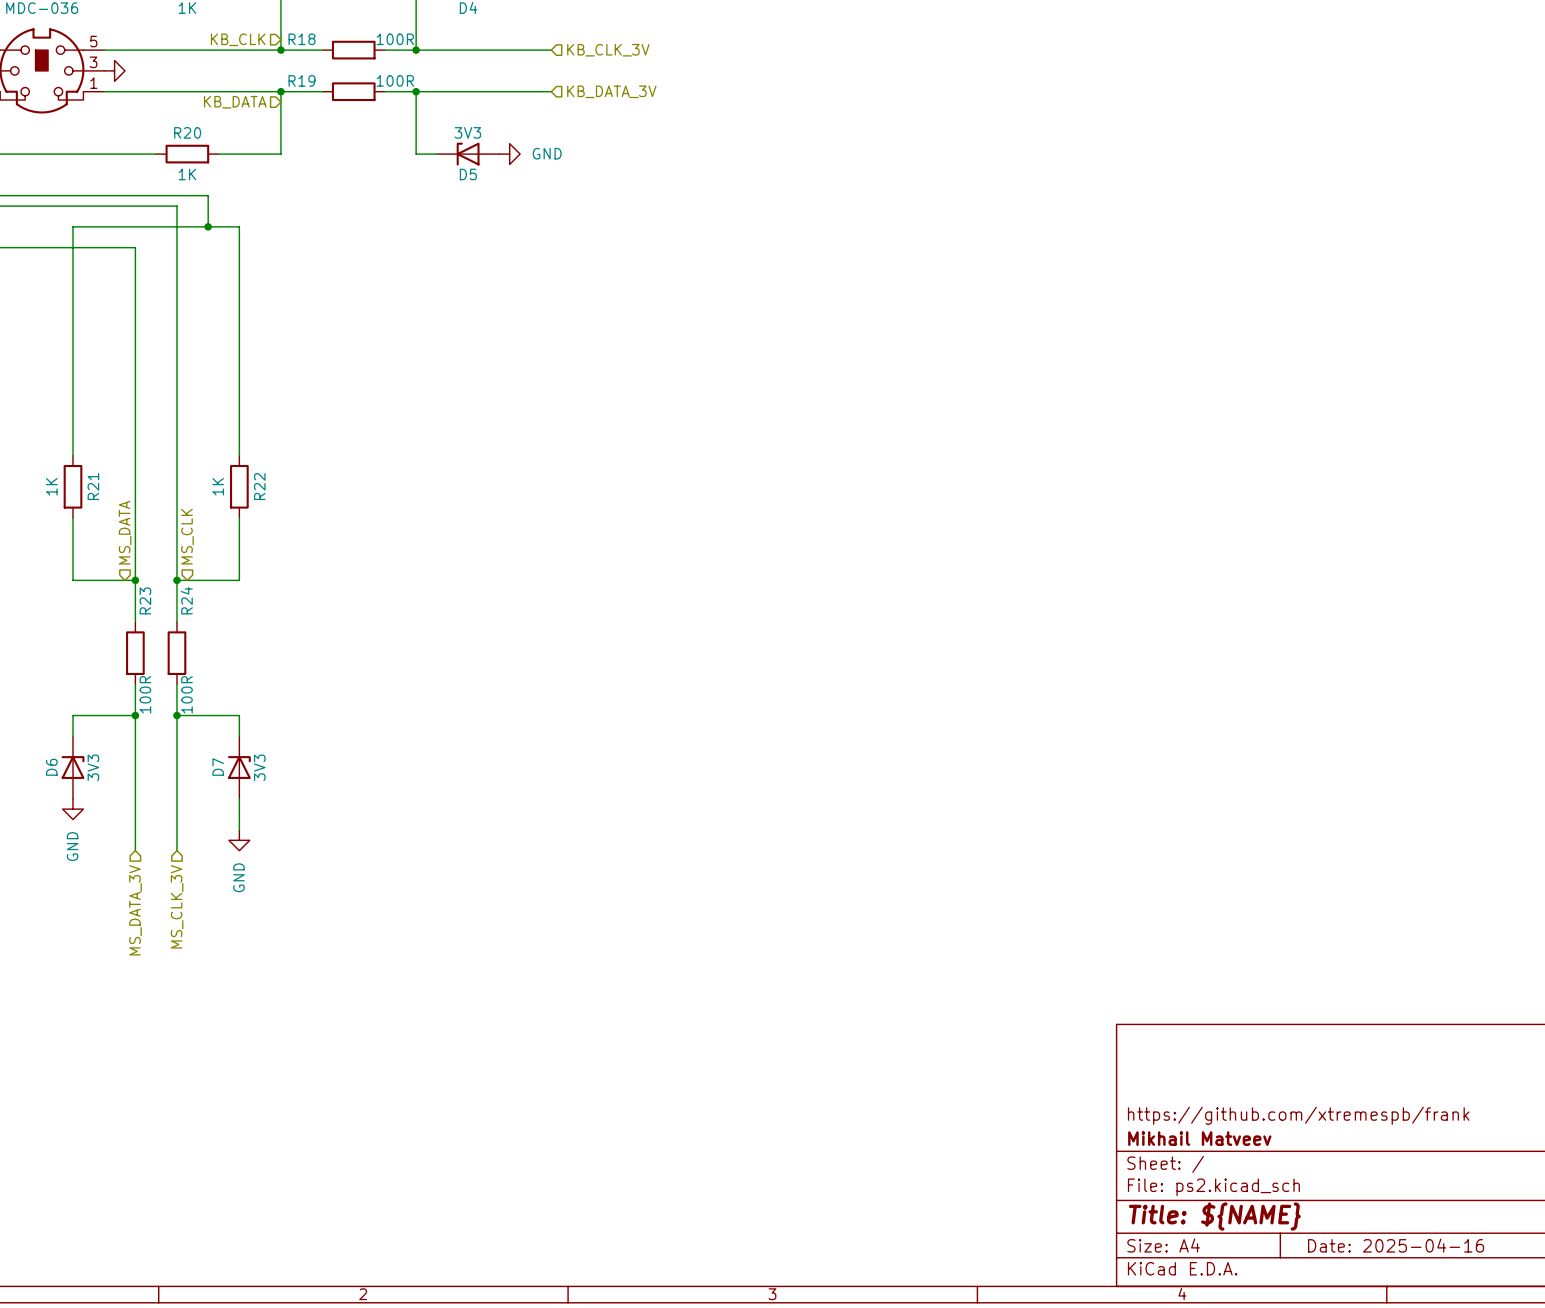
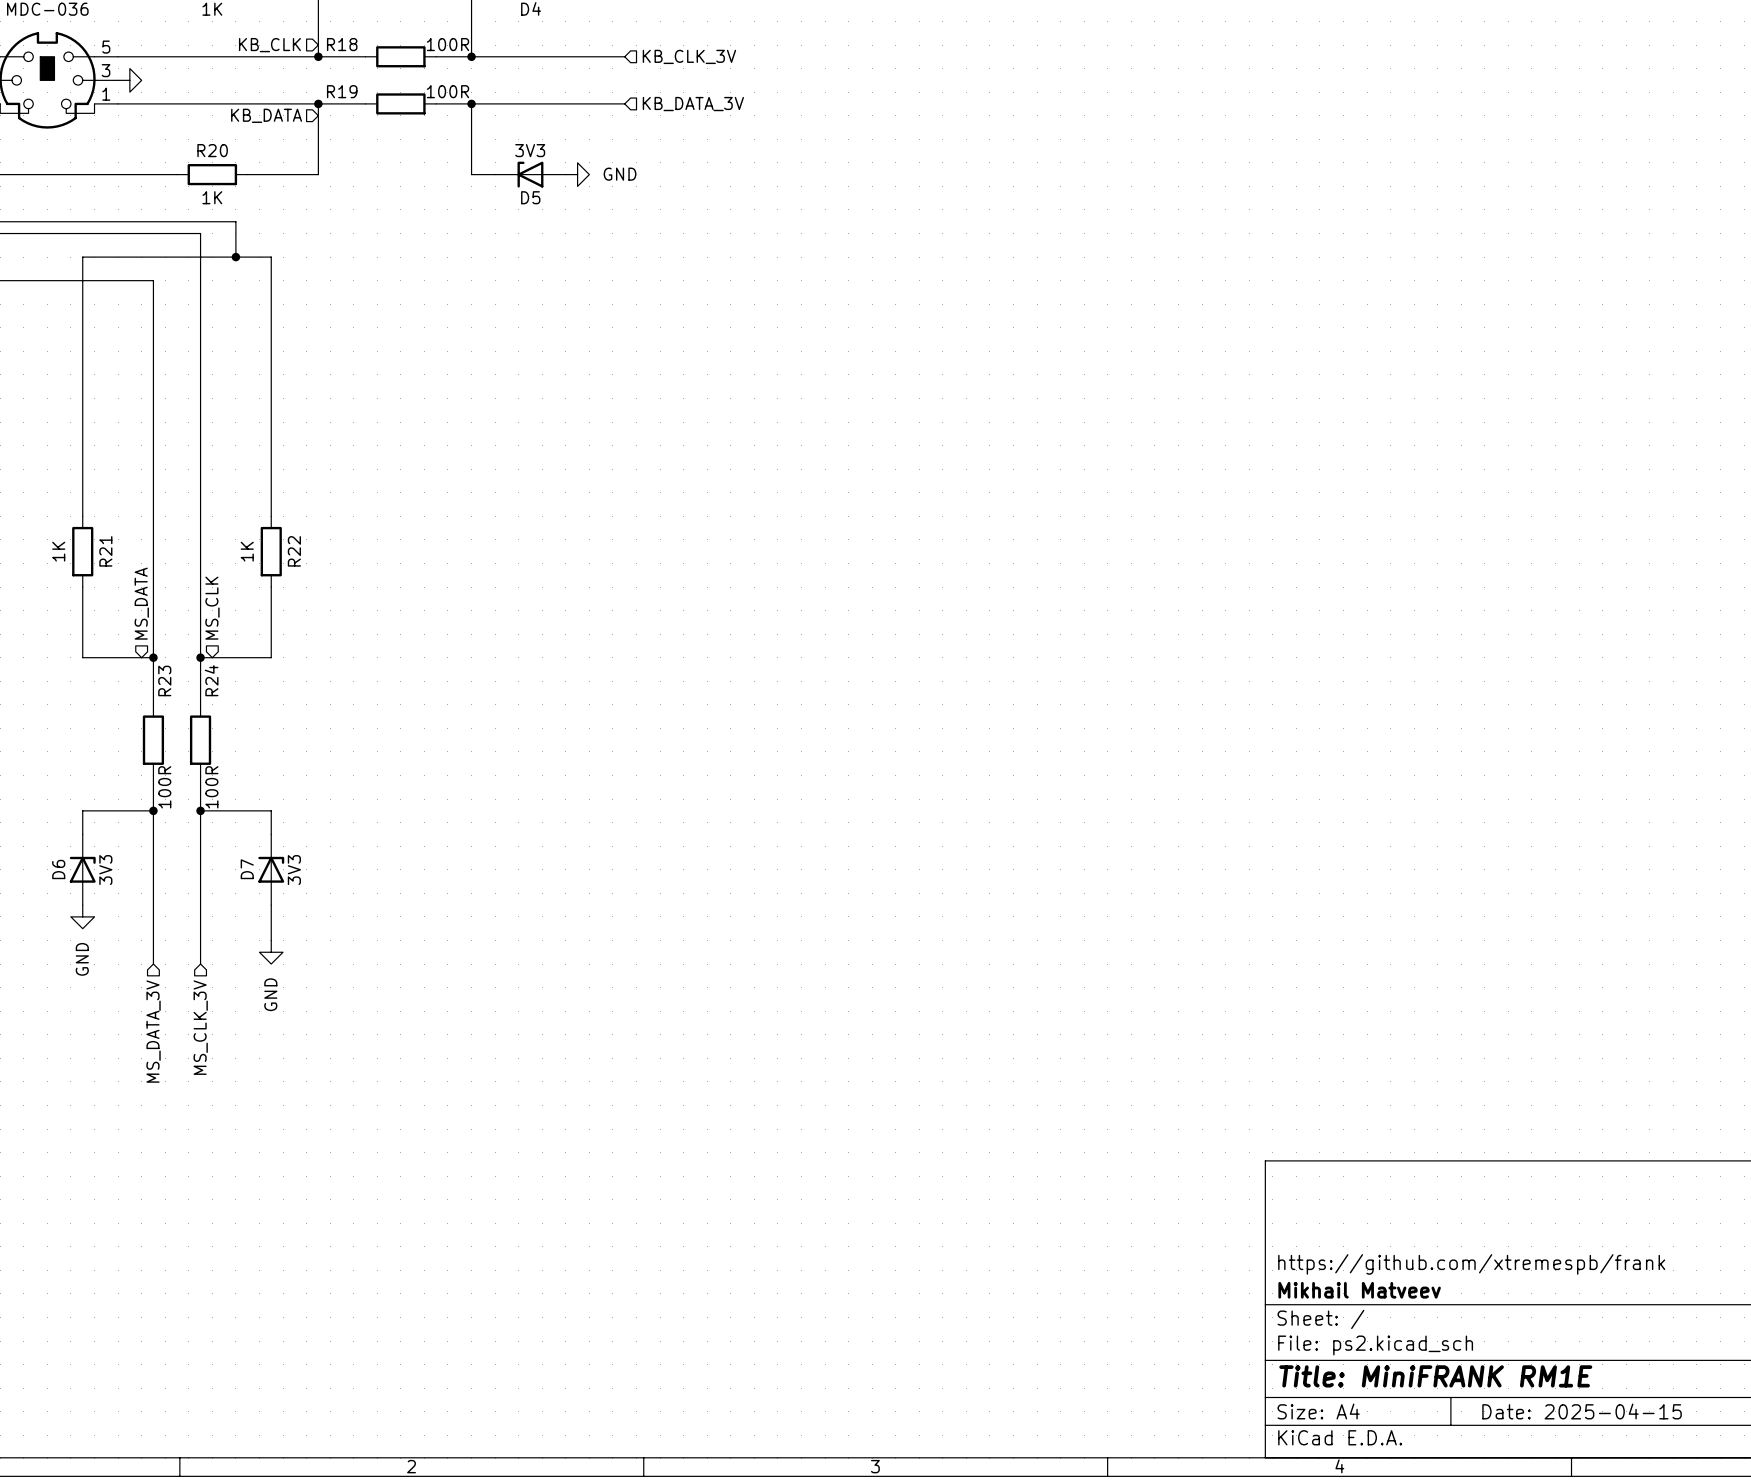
title block: Title: ${NAME} (1214, 1216) -> Title: MiniFRANK RM1E (1435, 1376)
title block: Date: 2025-04-16 (1396, 1245) -> Date: 2025-04-15 (1582, 1411)

